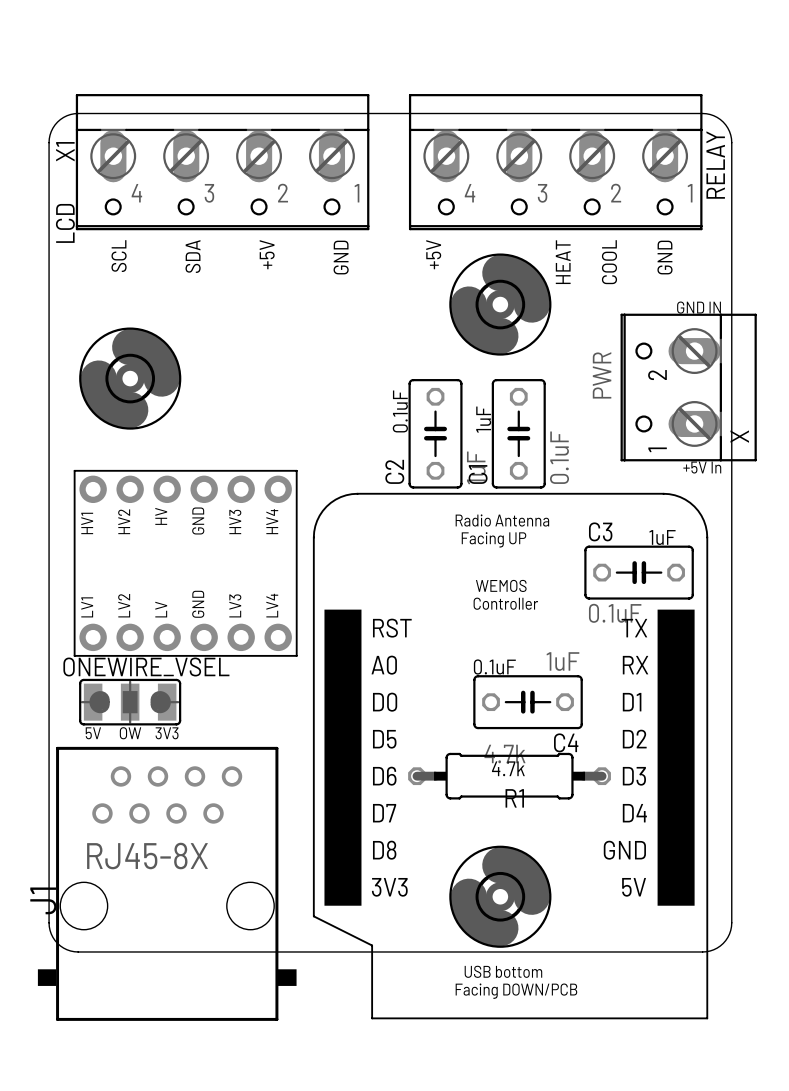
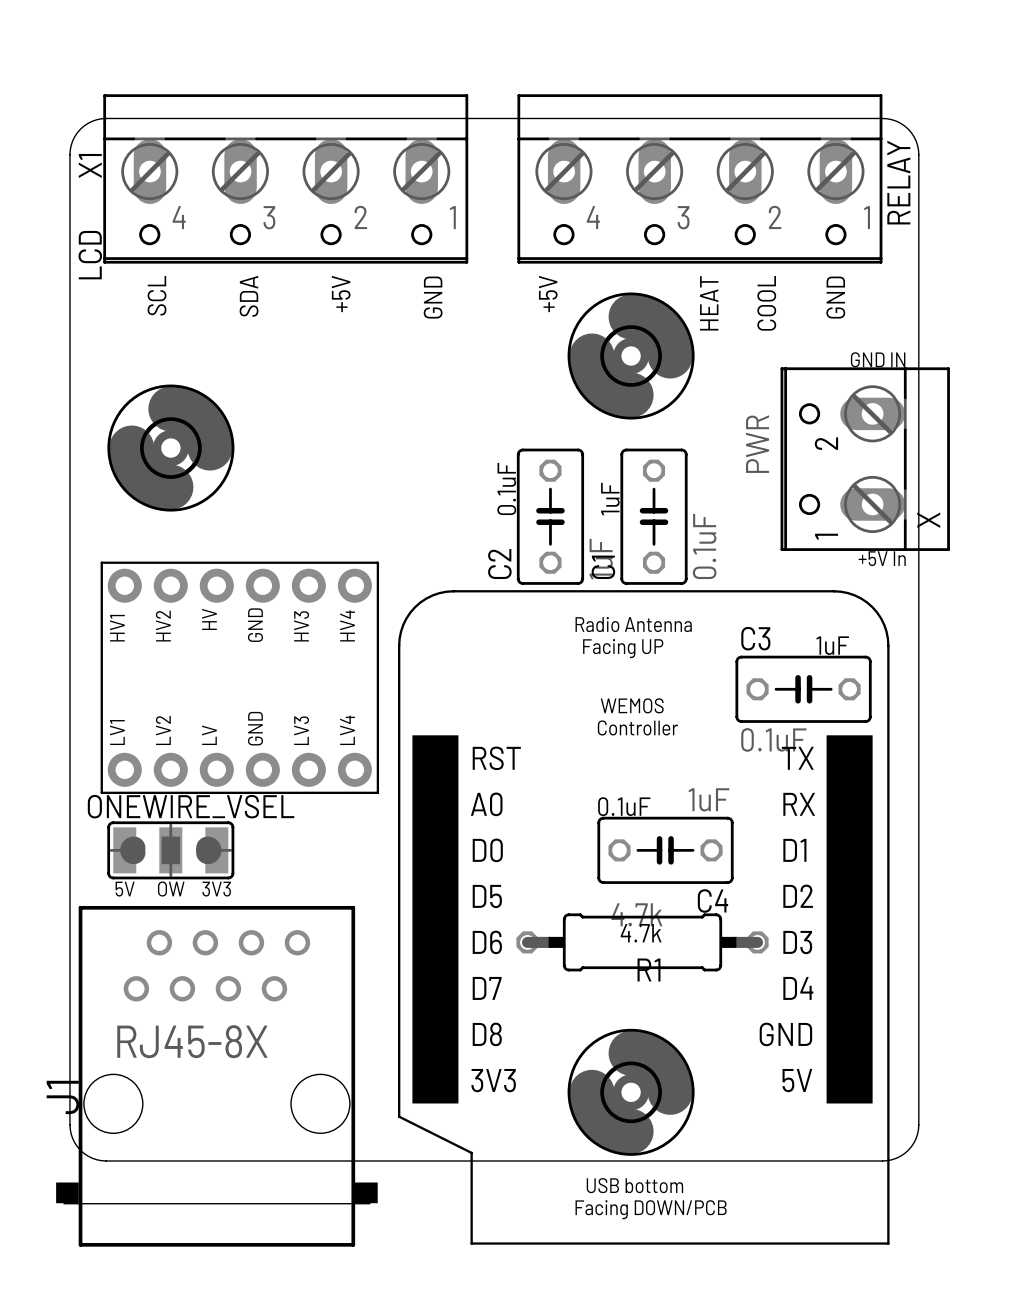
J1 footprint: [37, 746, 297, 1021] -> [56, 905, 378, 1247]

